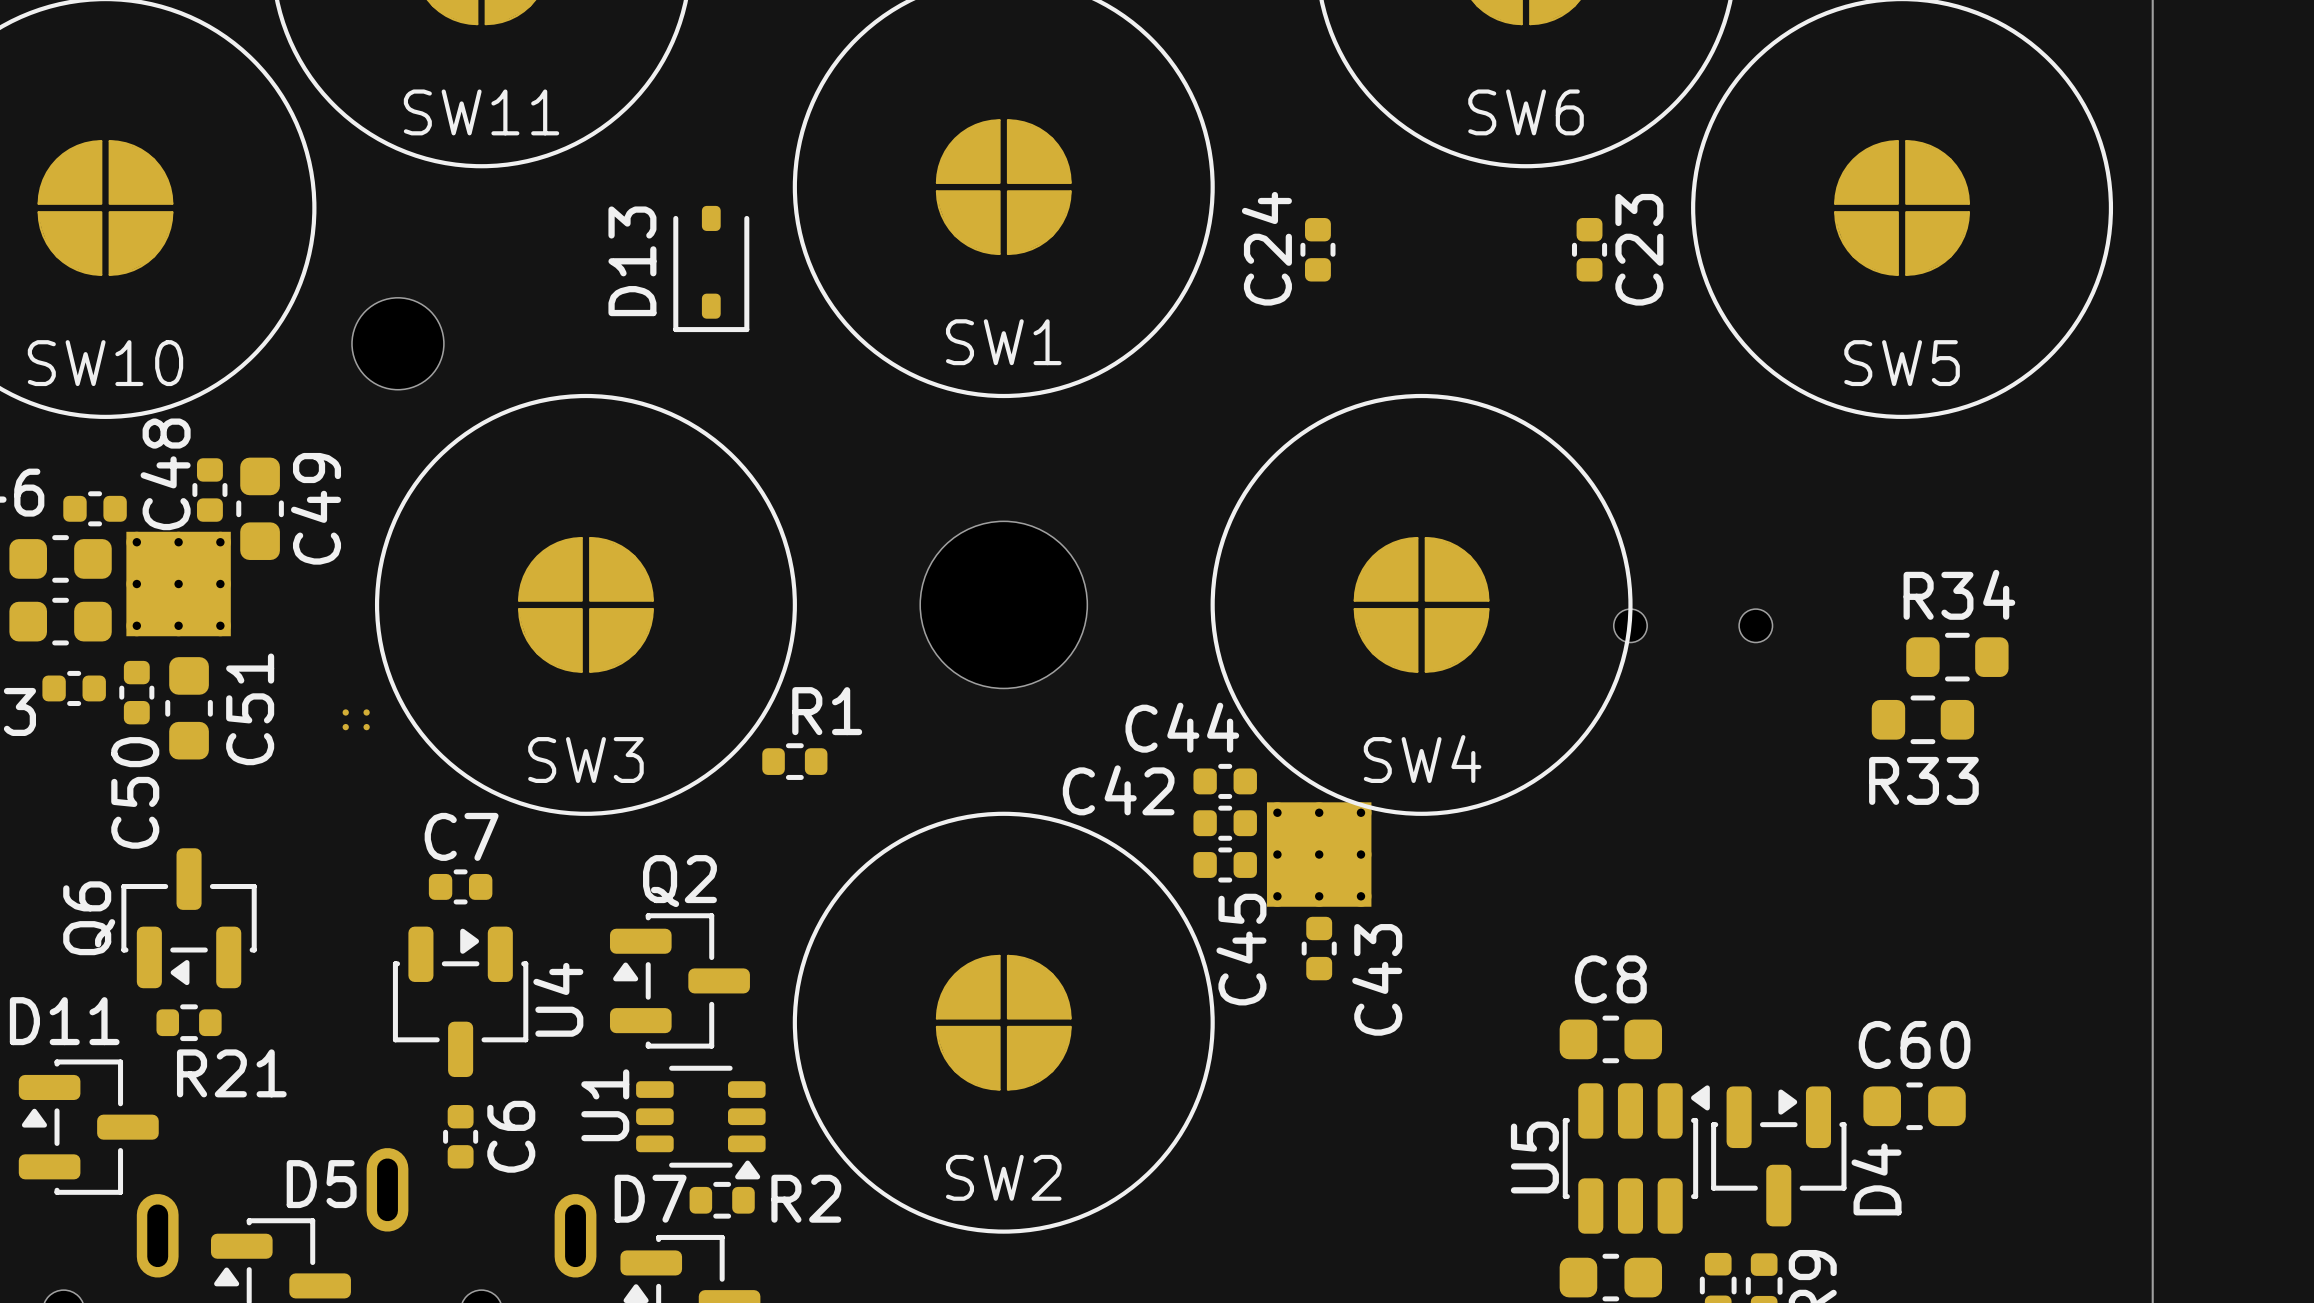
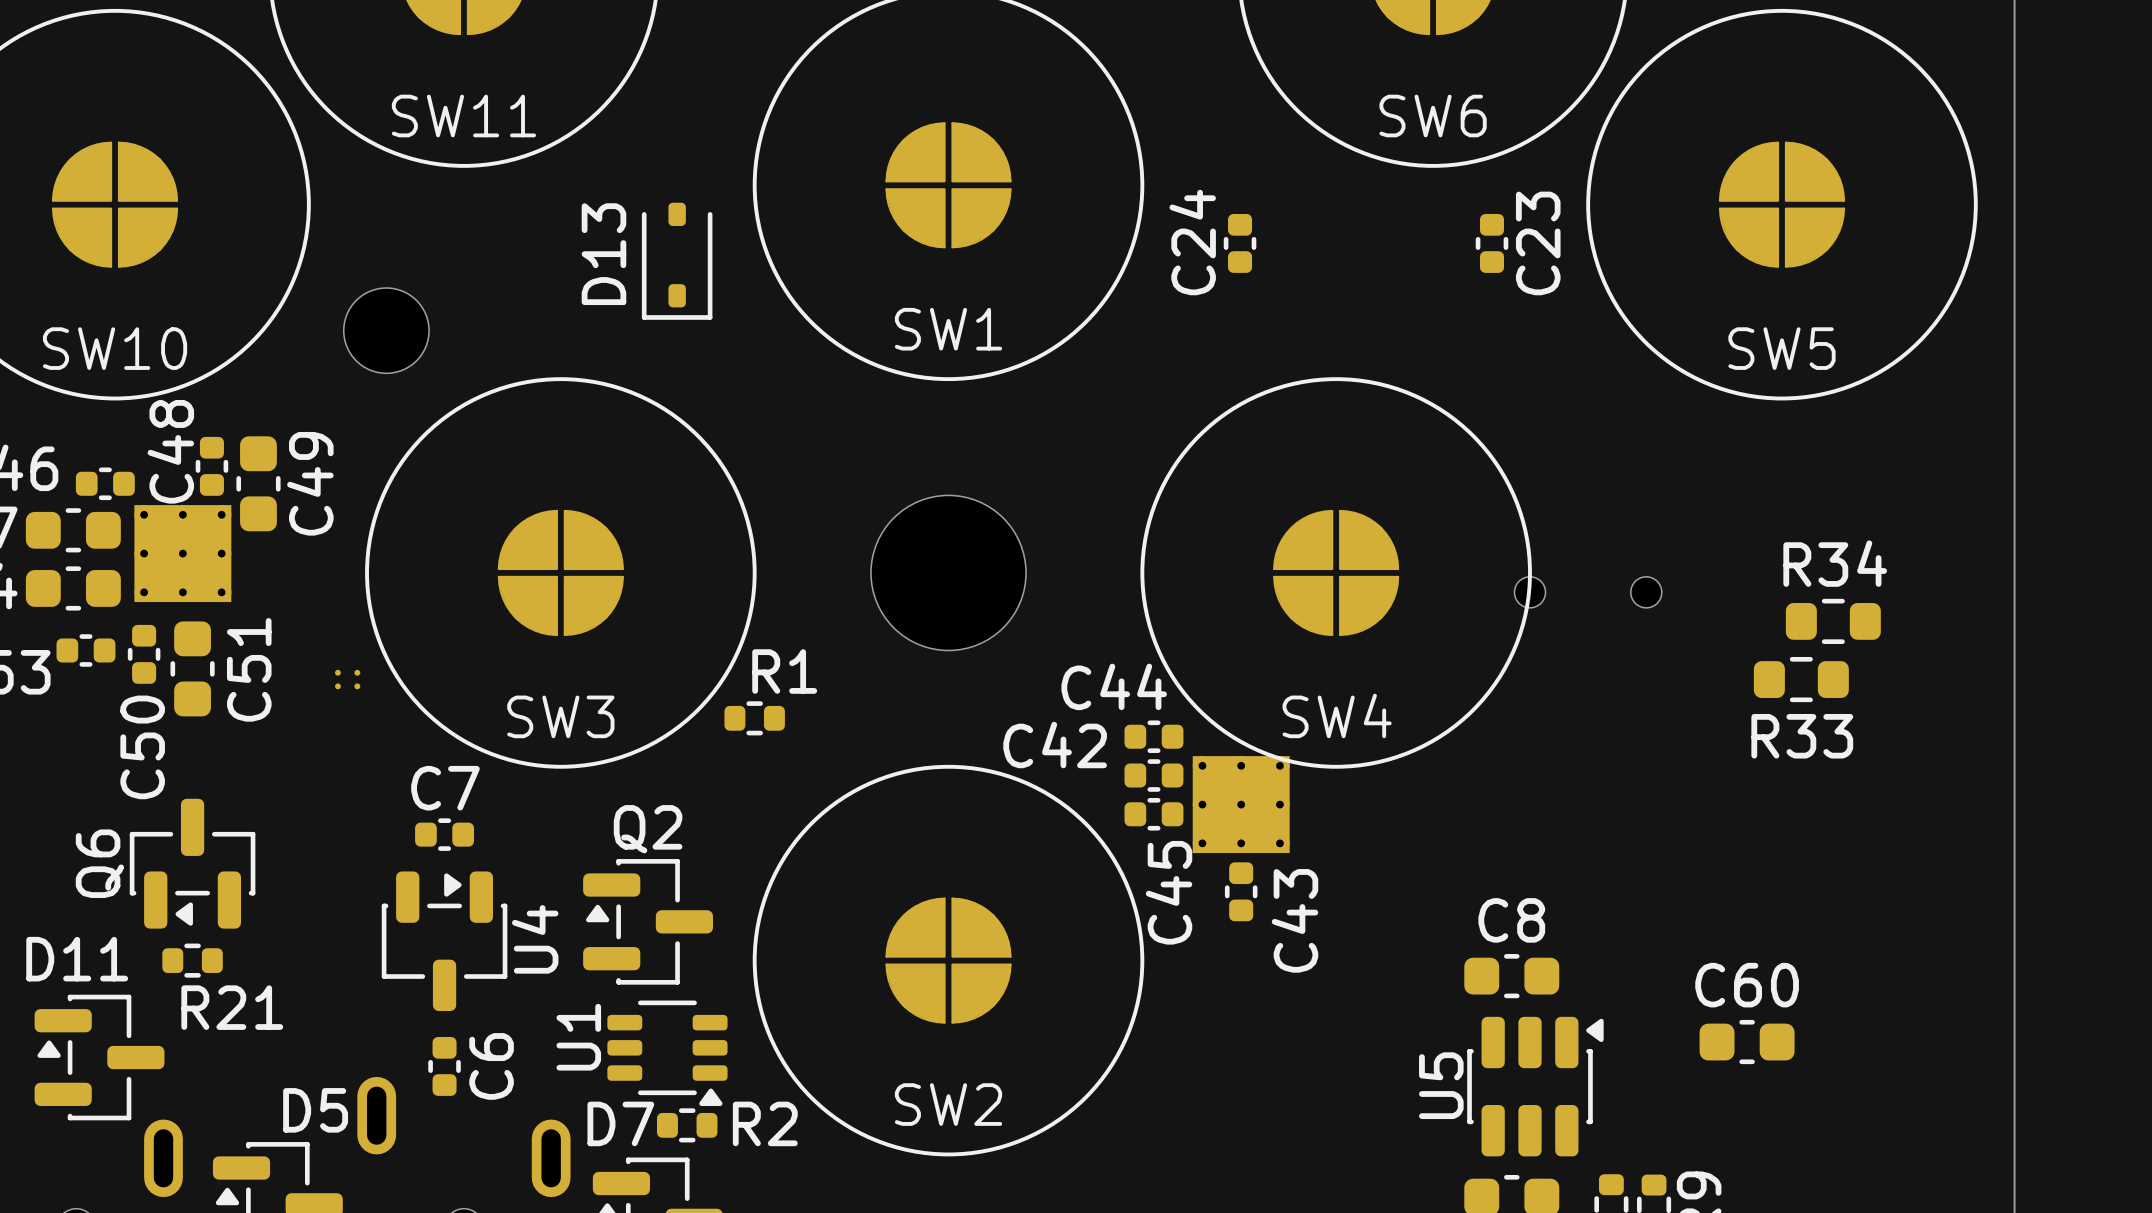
C60 position: (1914, 1106) -> (1747, 1042)
D4: (1778, 1156) -> none

